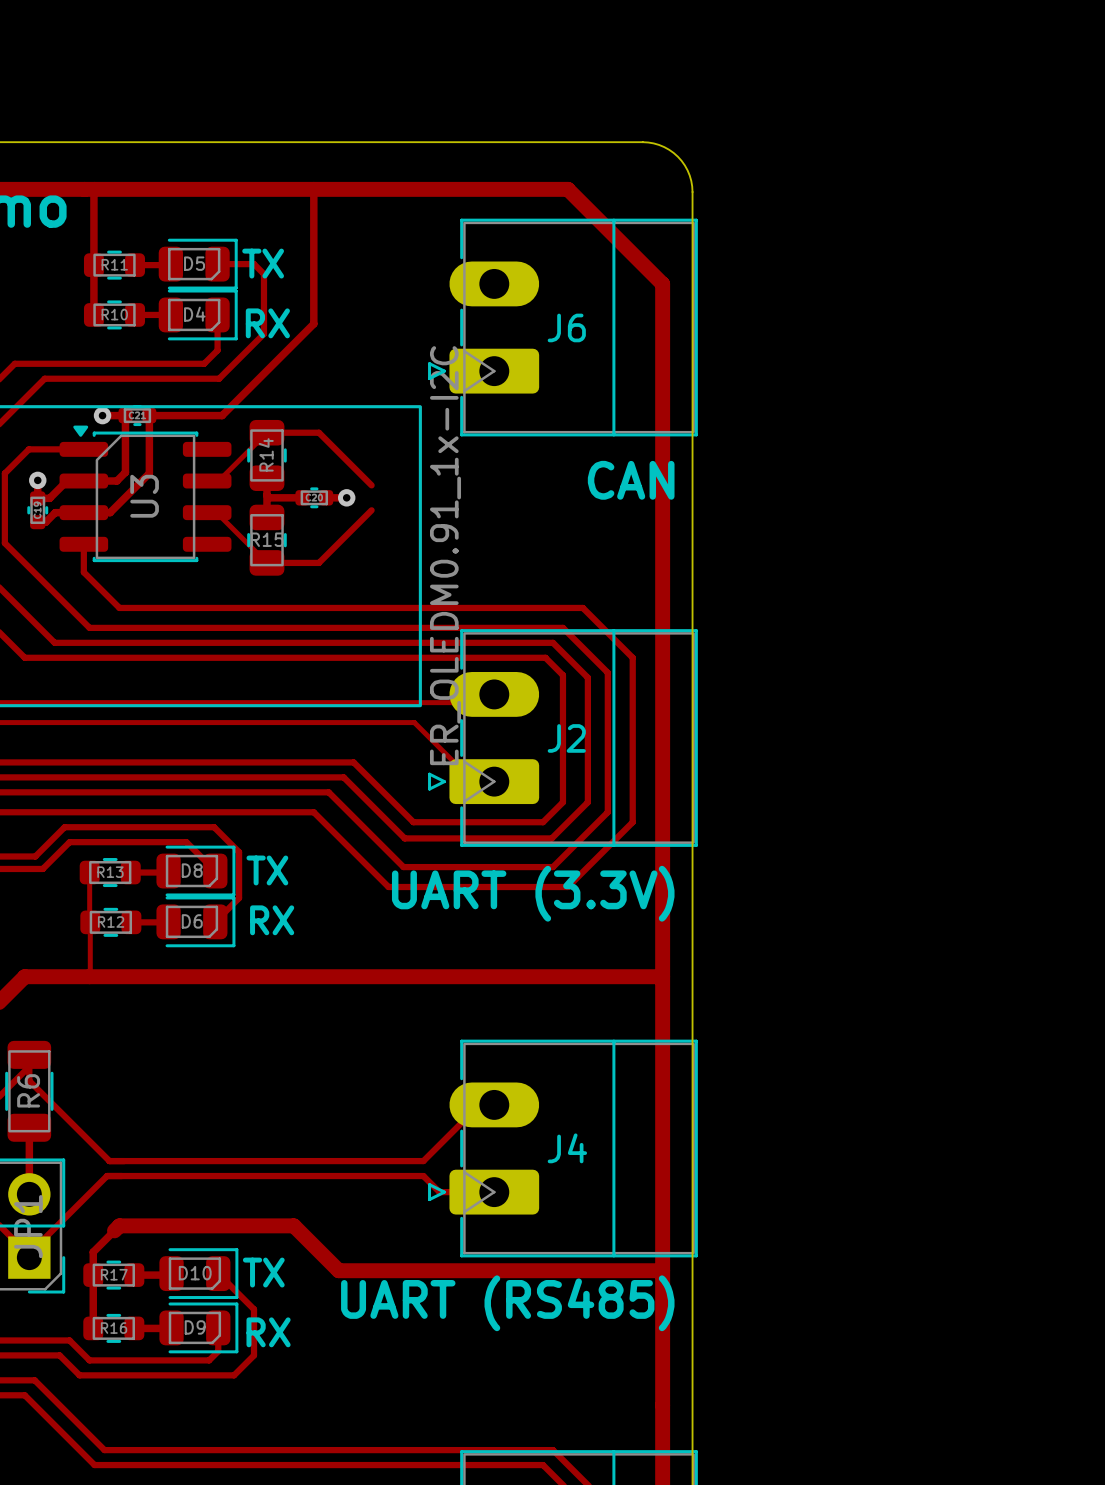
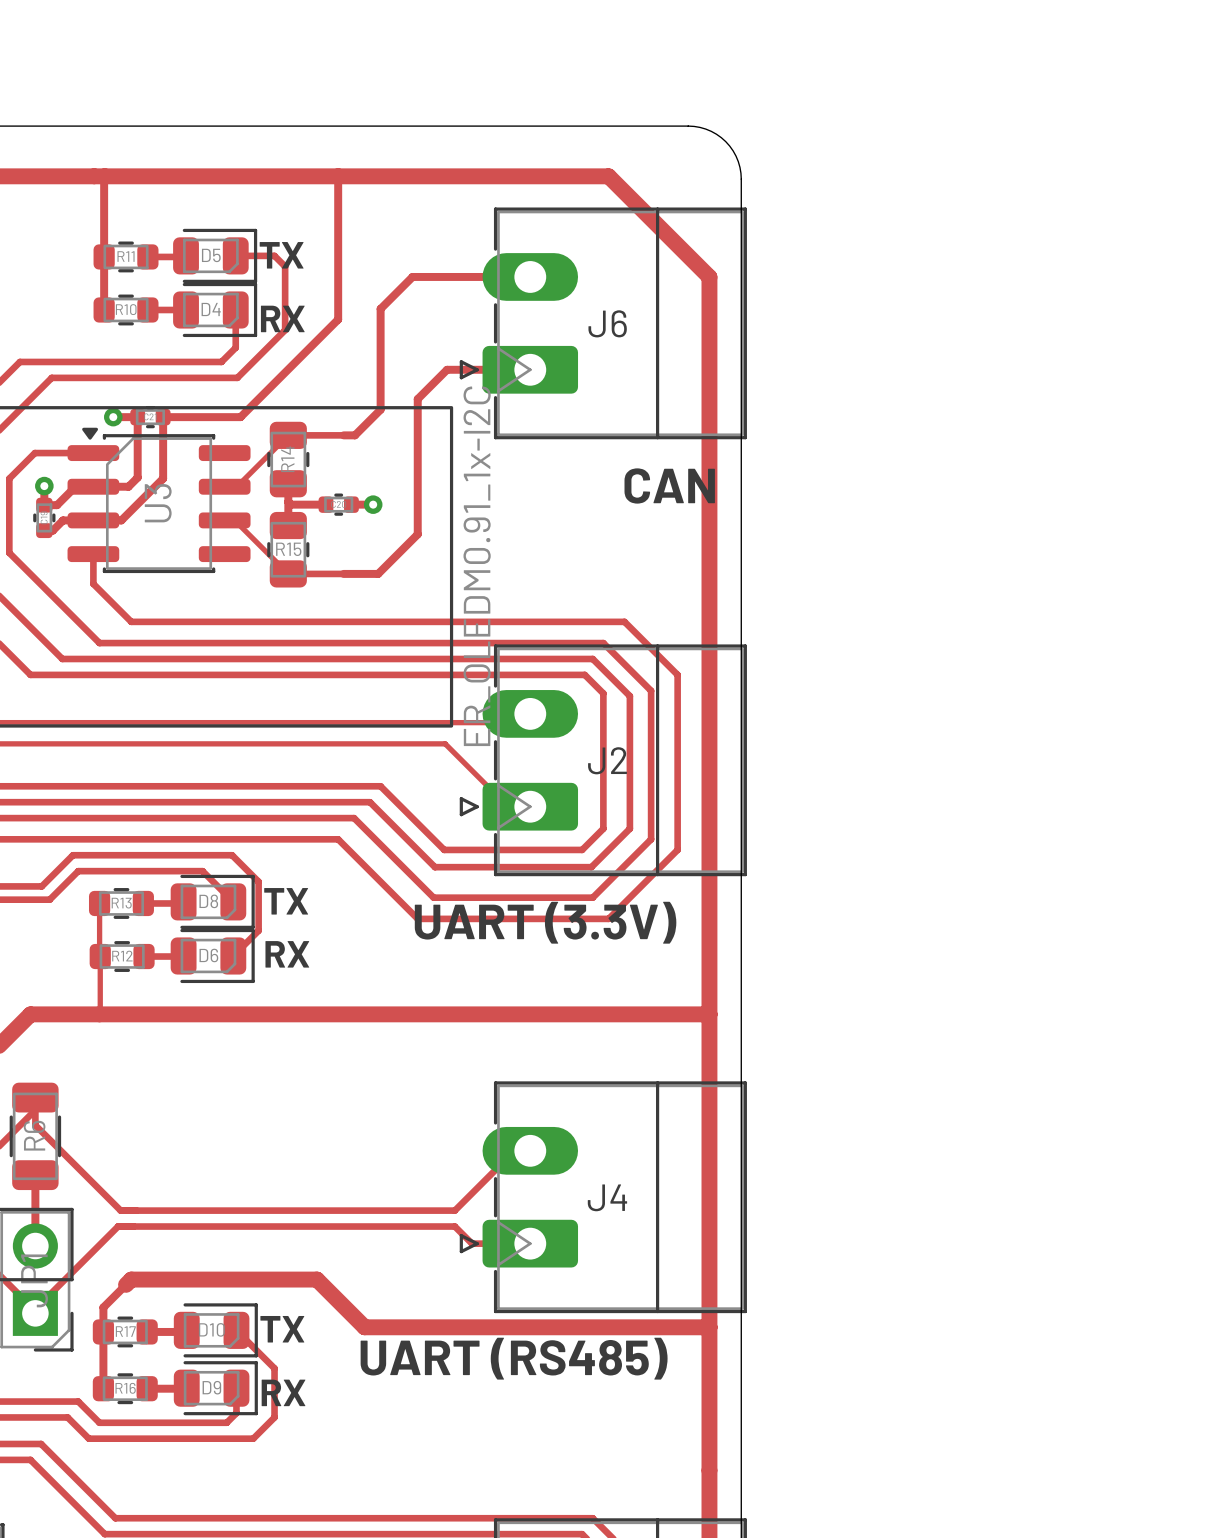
track: (318, 432) (371, 485) -> (343, 435) (354, 435) (380, 409) (380, 308) (412, 276) (530, 276)
track: (371, 510) (318, 562) -> (530, 369) (447, 369) (417, 399) (417, 534) (378, 573) (343, 573)

